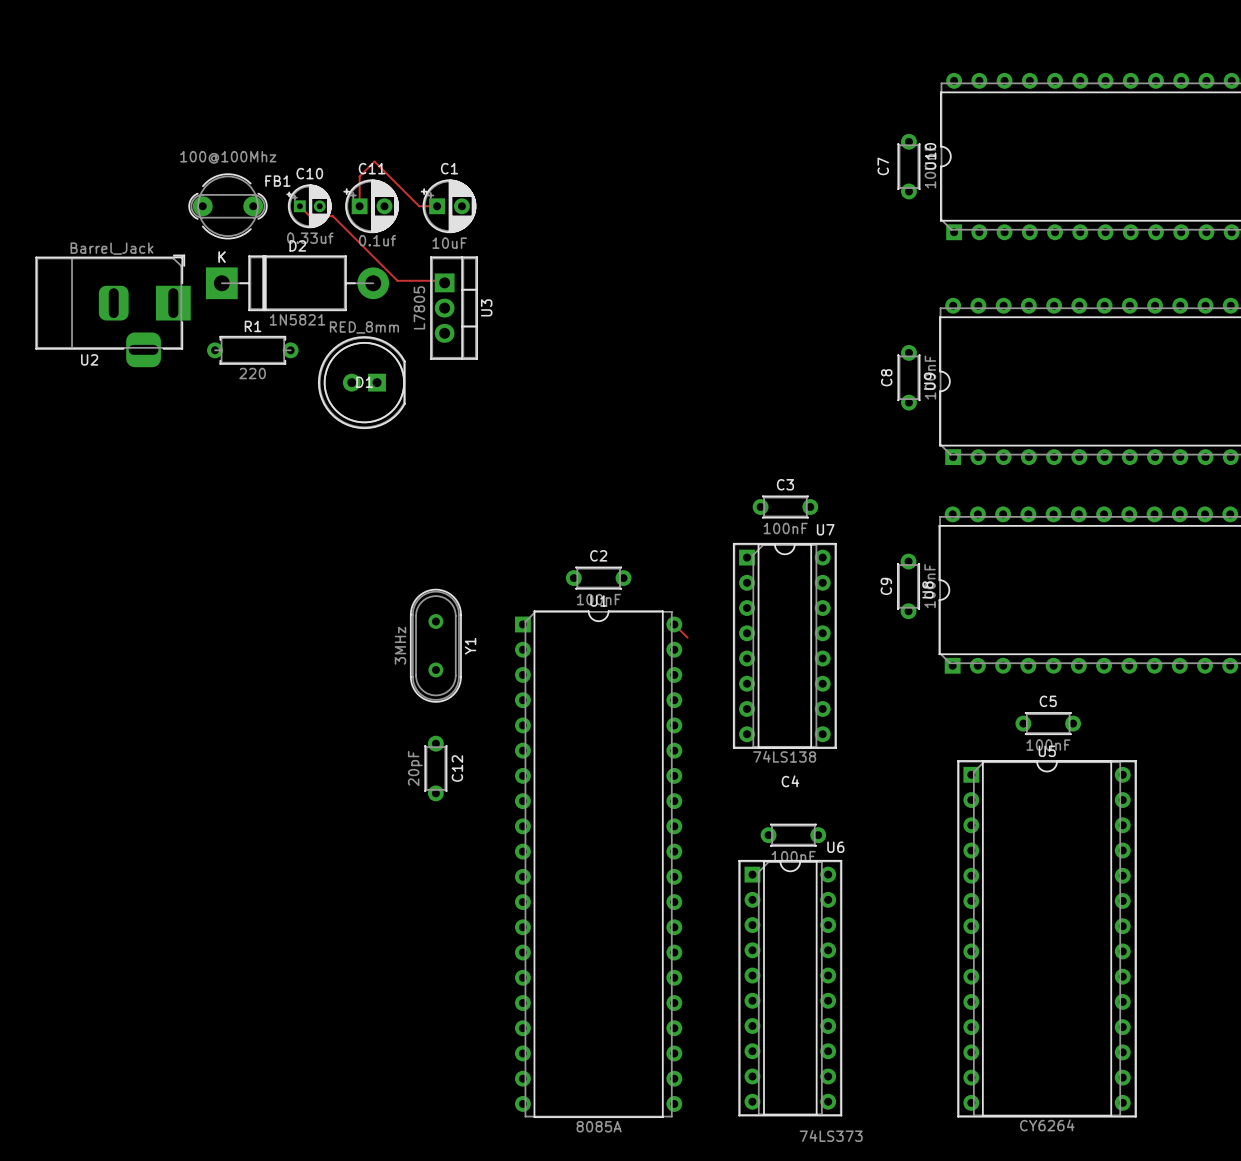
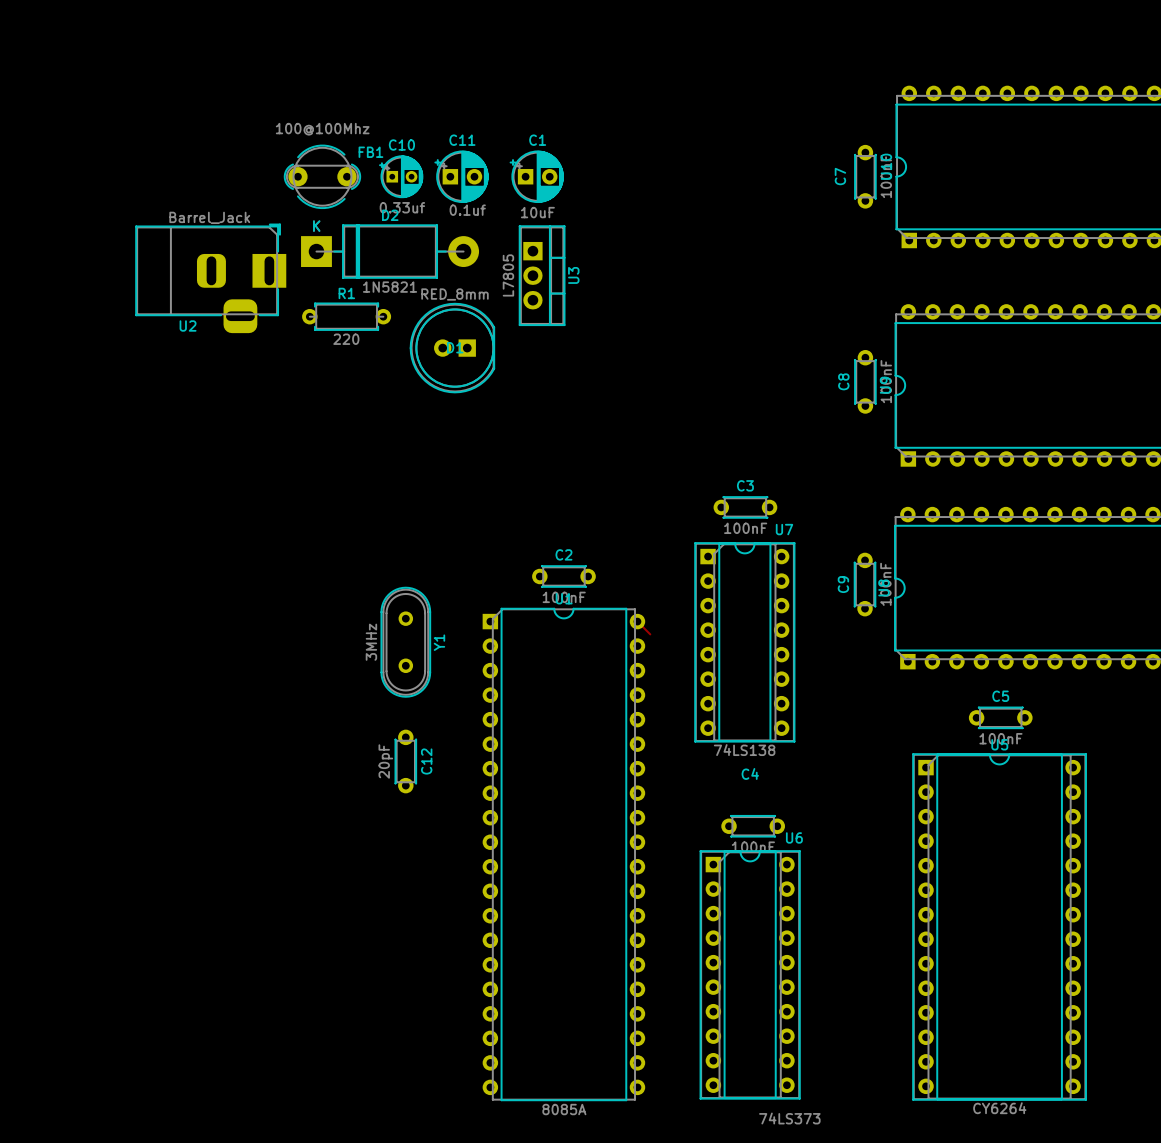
FB1 position: (228, 206) -> (322, 176)
track: (299, 206) (309, 216) (332, 216) (397, 280) (444, 280) (444, 282) -> none
C10 position: (309, 206) -> (401, 176)
track: (359, 206) (359, 176) (374, 161) (419, 206) (437, 206) -> none
C11 position: (371, 206) -> (461, 176)
C1 position: (448, 206) -> (536, 176)
D2 position: (297, 283) -> (390, 251)
U3 position: (454, 308) -> (542, 275)
U2 position: (113, 311) -> (210, 278)
R1 position: (252, 350) -> (346, 316)
D1 position: (361, 382) -> (452, 348)

